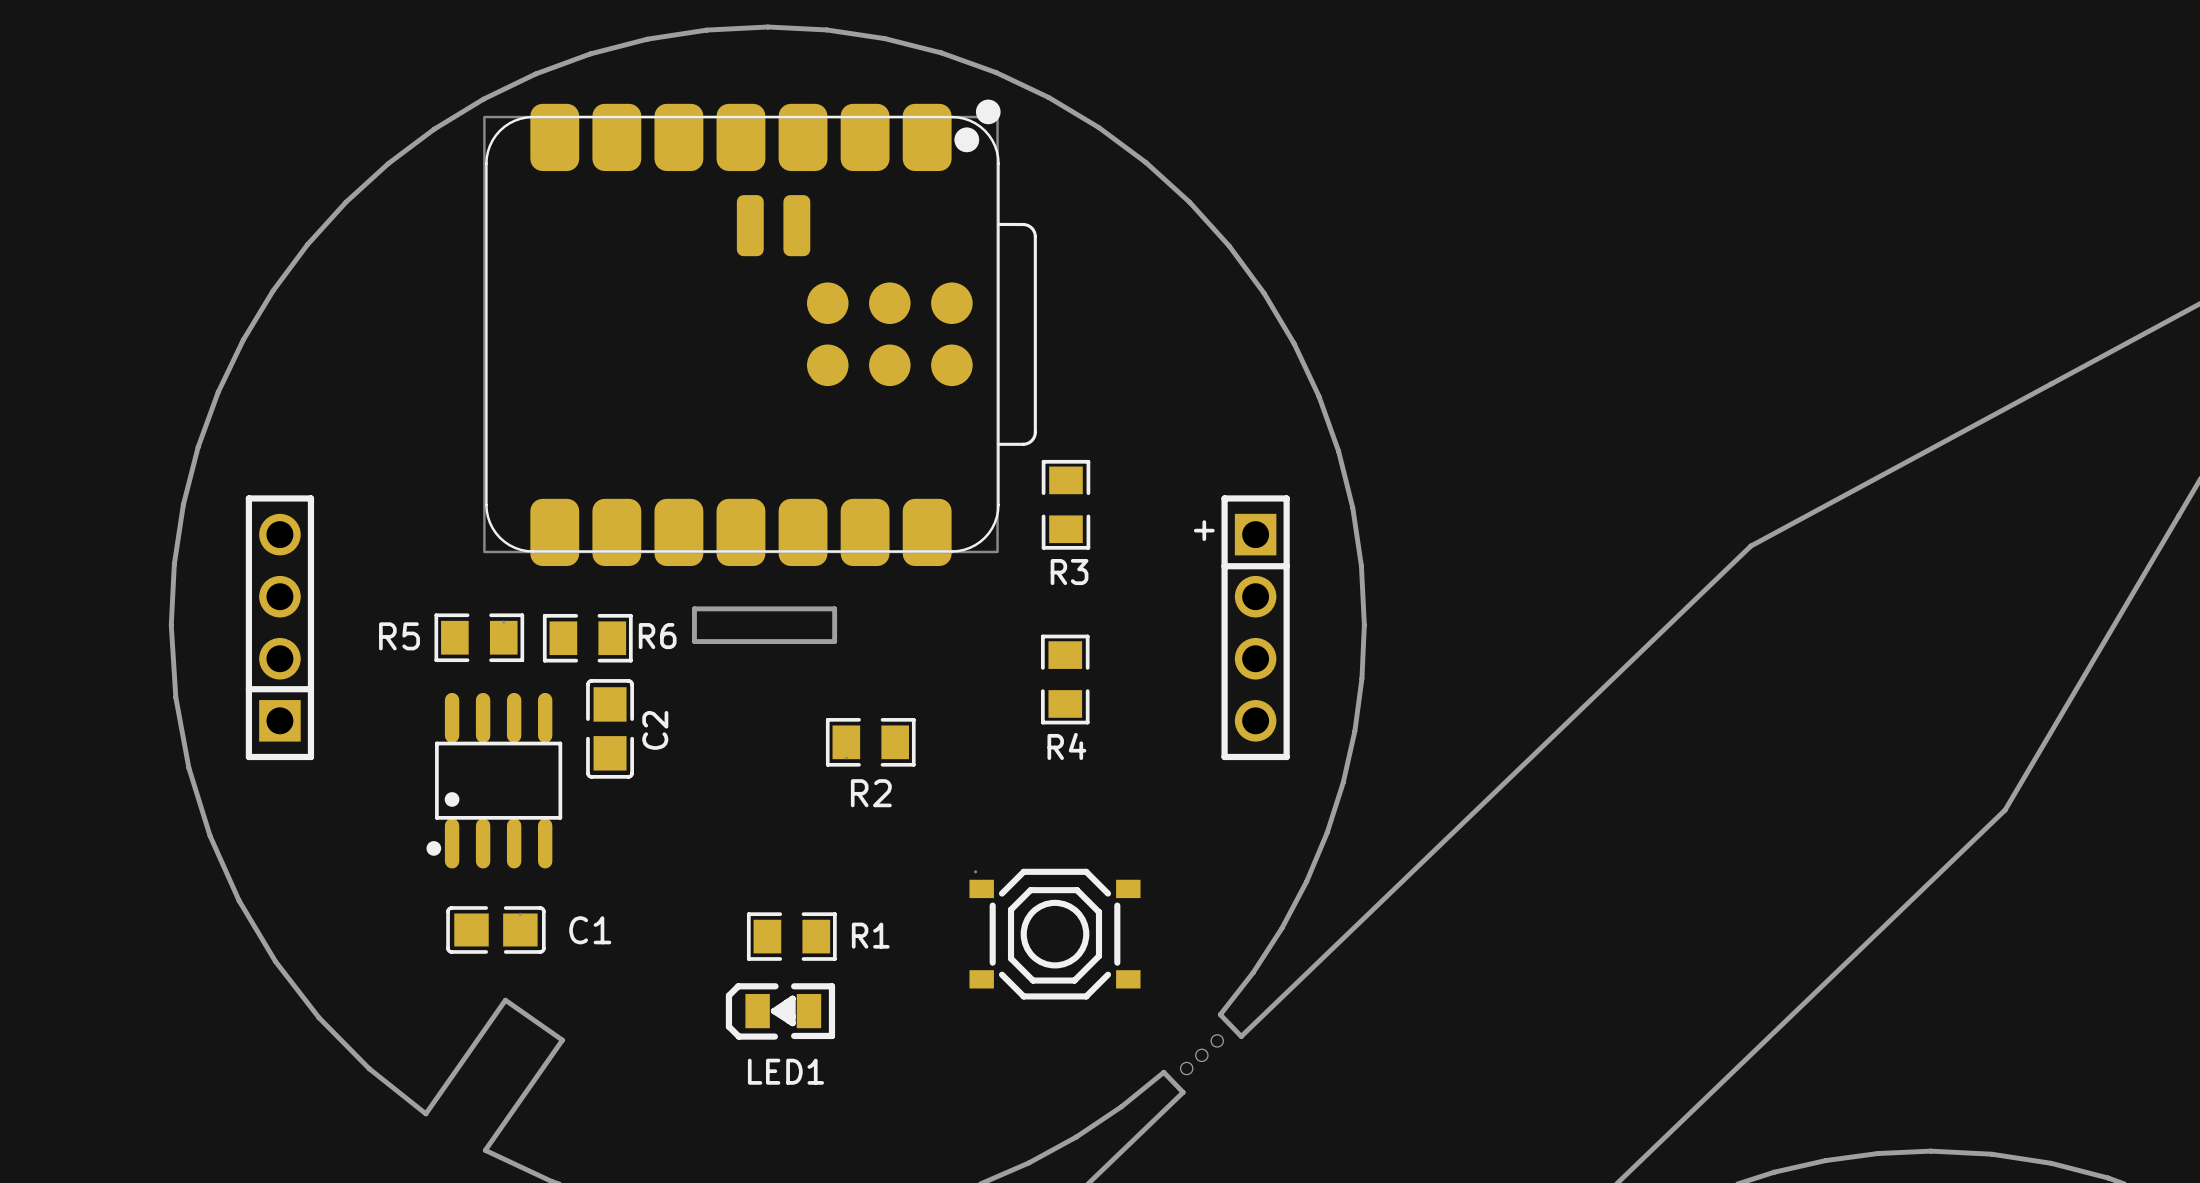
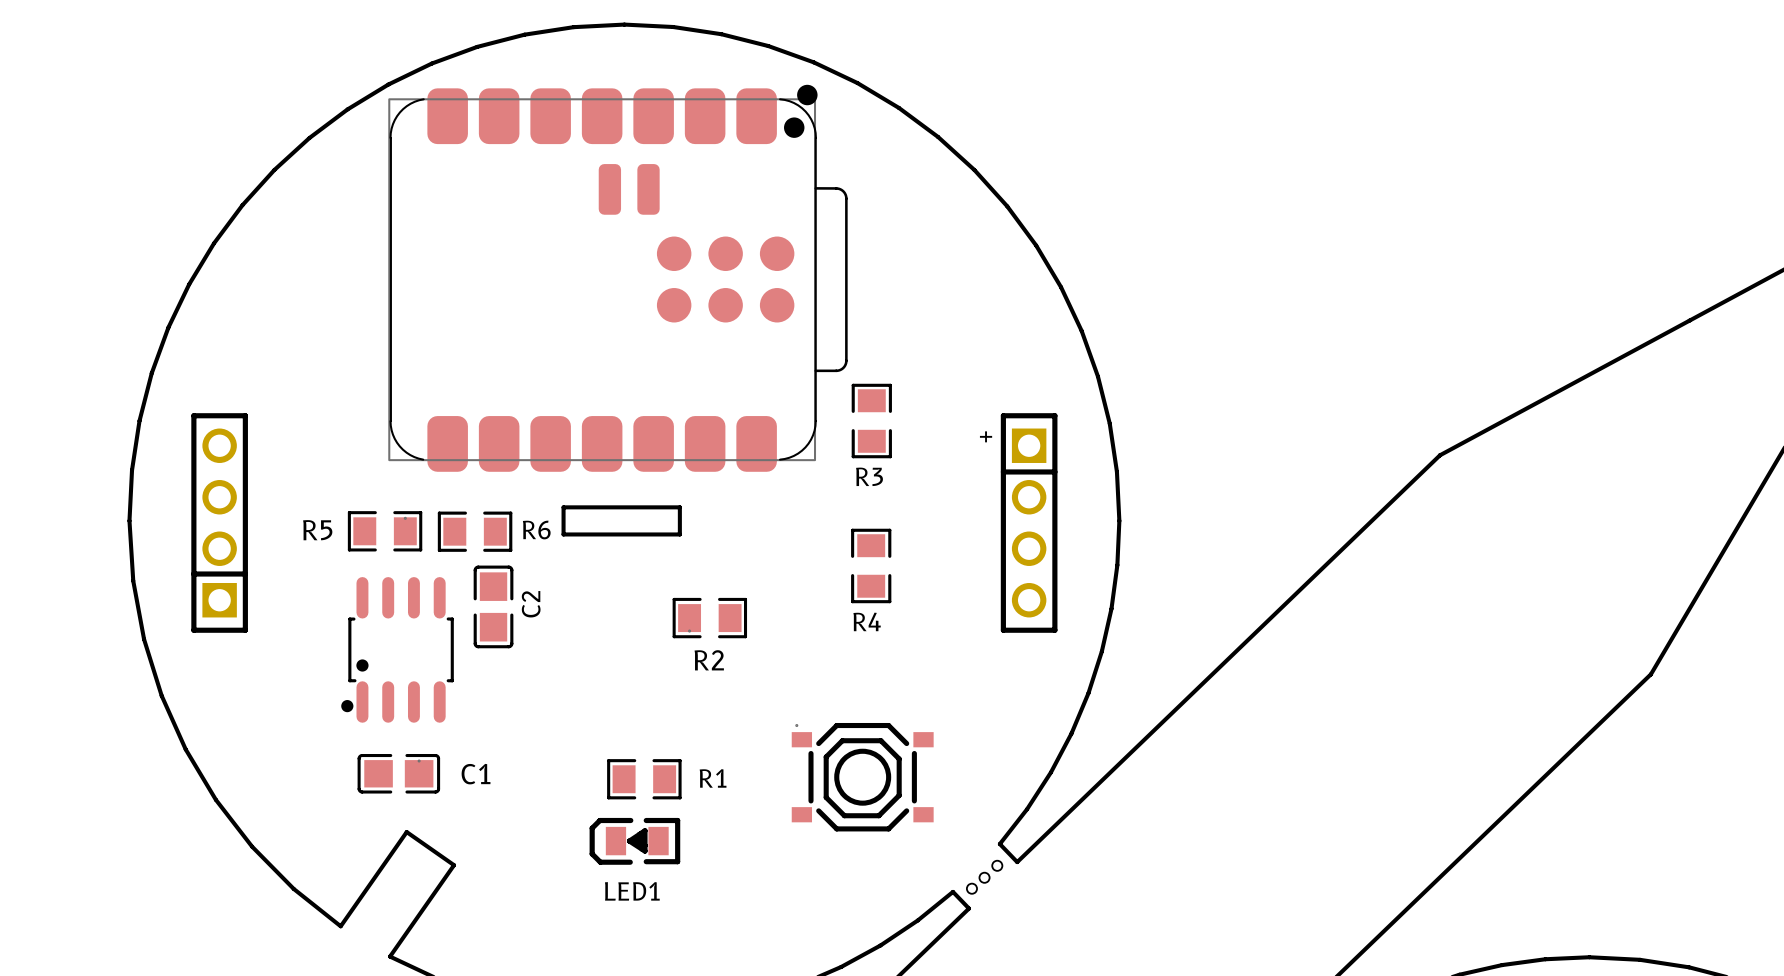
part footprint: [483, 99, 1037, 567] -> [388, 84, 848, 472]
part footprint: [426, 692, 563, 869] -> [341, 577, 454, 723]

